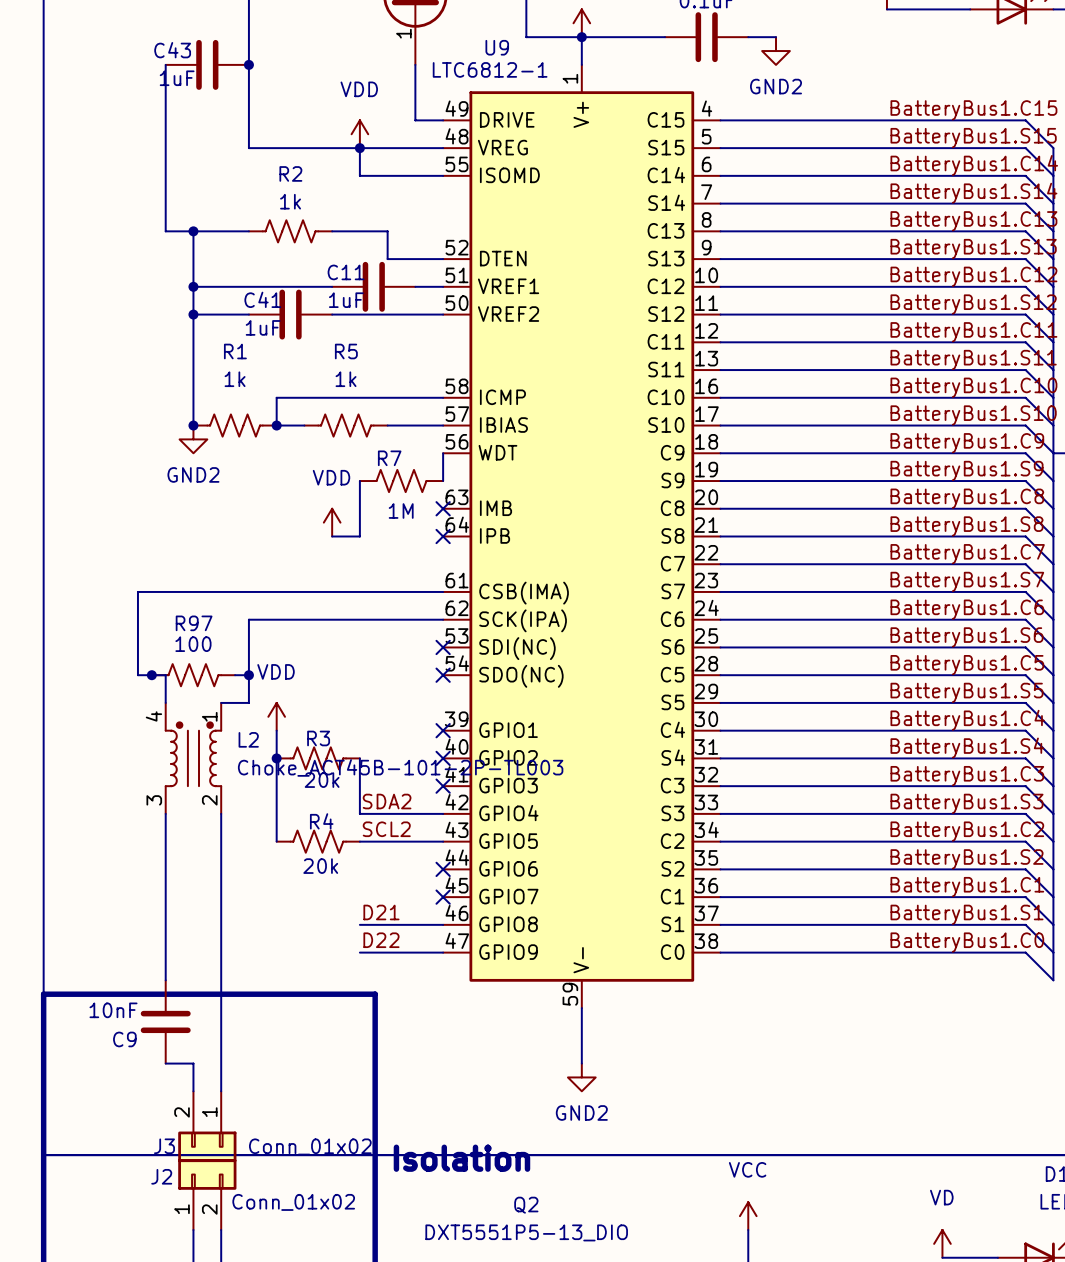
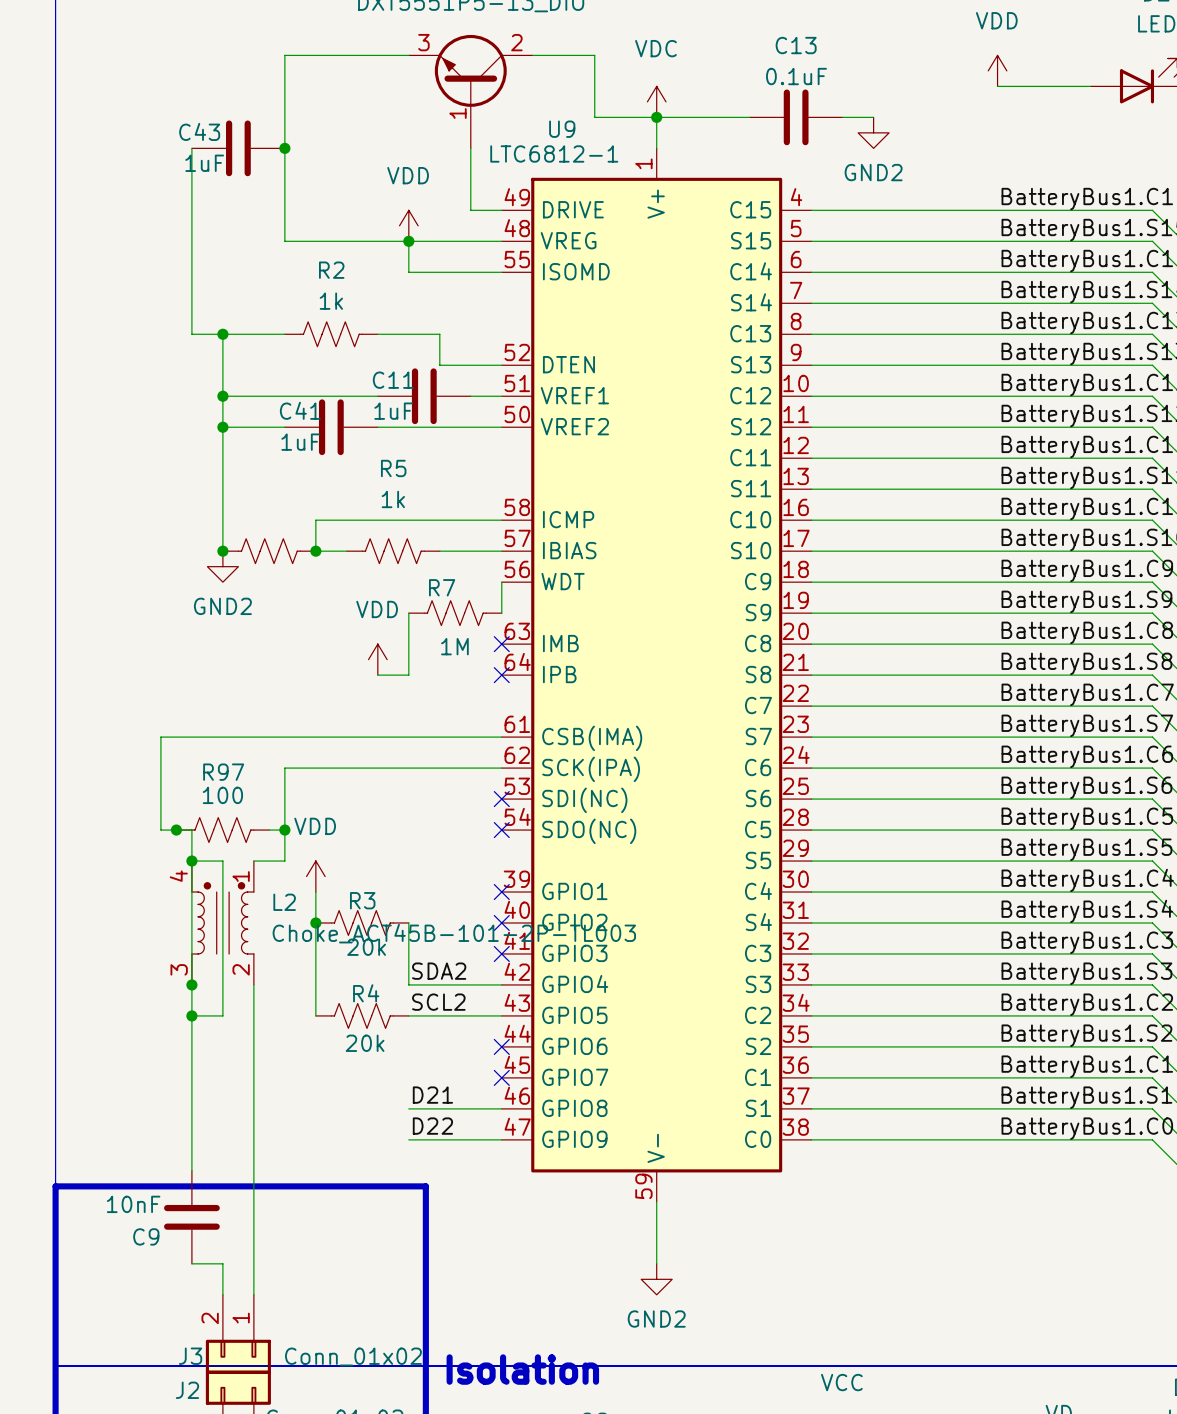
R1 name: R1 (235, 351) -> none
R1 value: 1k (235, 379) -> none
junction: none -> (191, 861)
wire: none -> (191, 984) (191, 861) (222, 861) (222, 1015) (191, 1015)
junction: none -> (191, 984)
junction: none -> (191, 1015)

